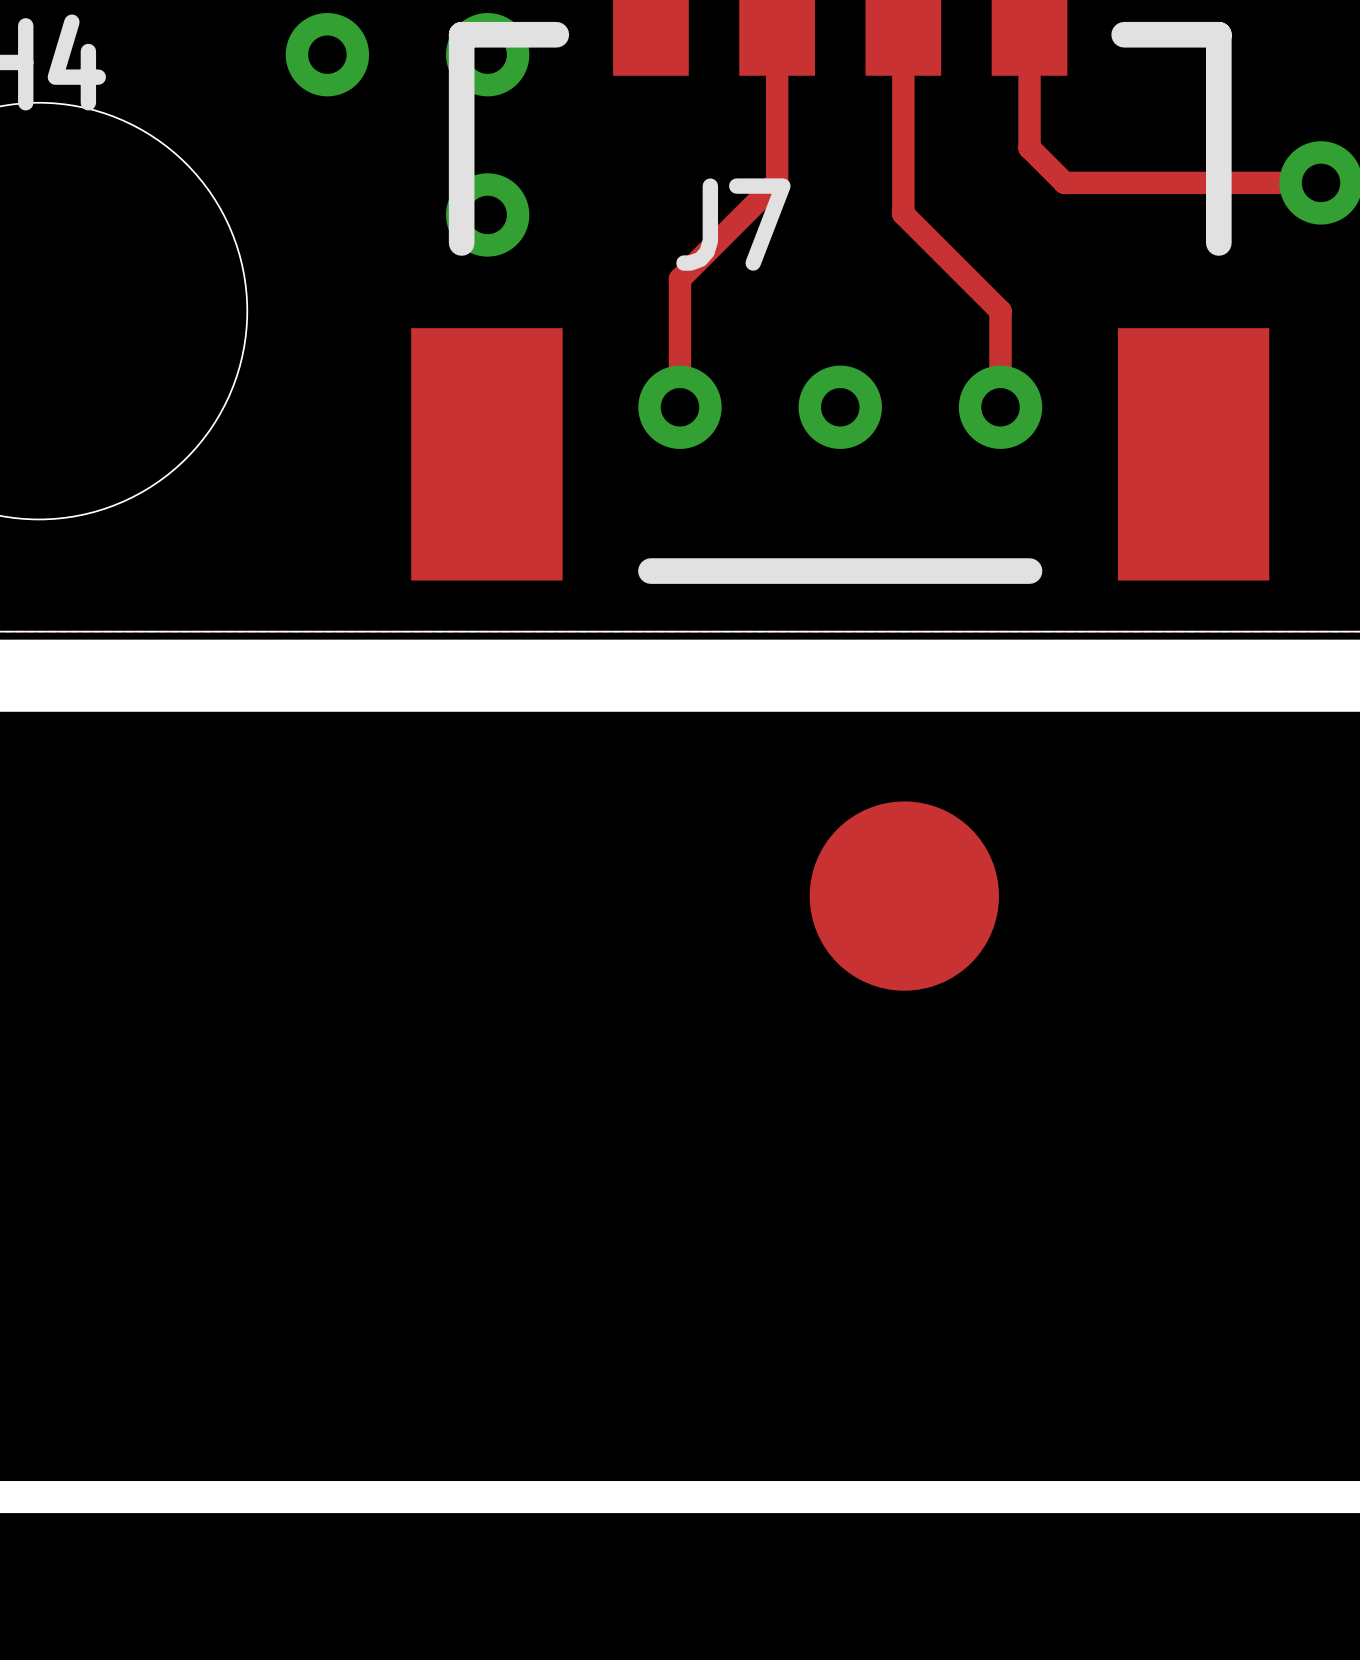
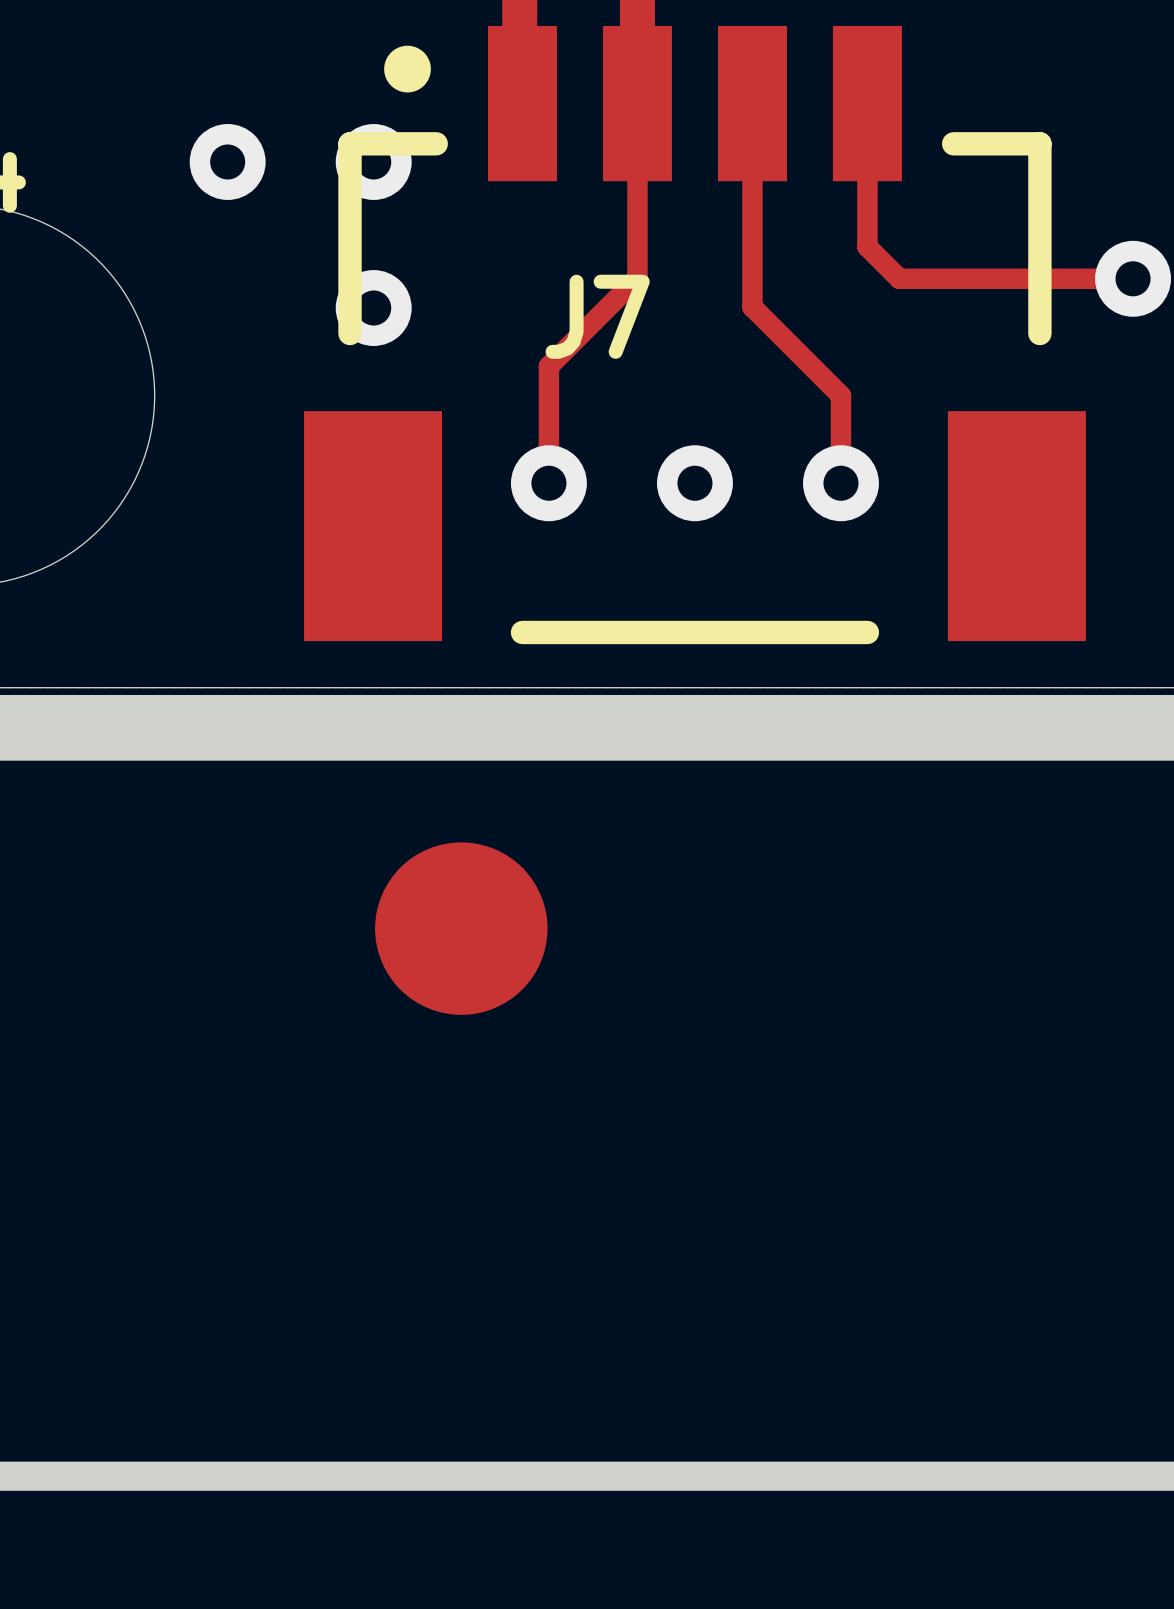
part position: (904, 896) -> (461, 928)

